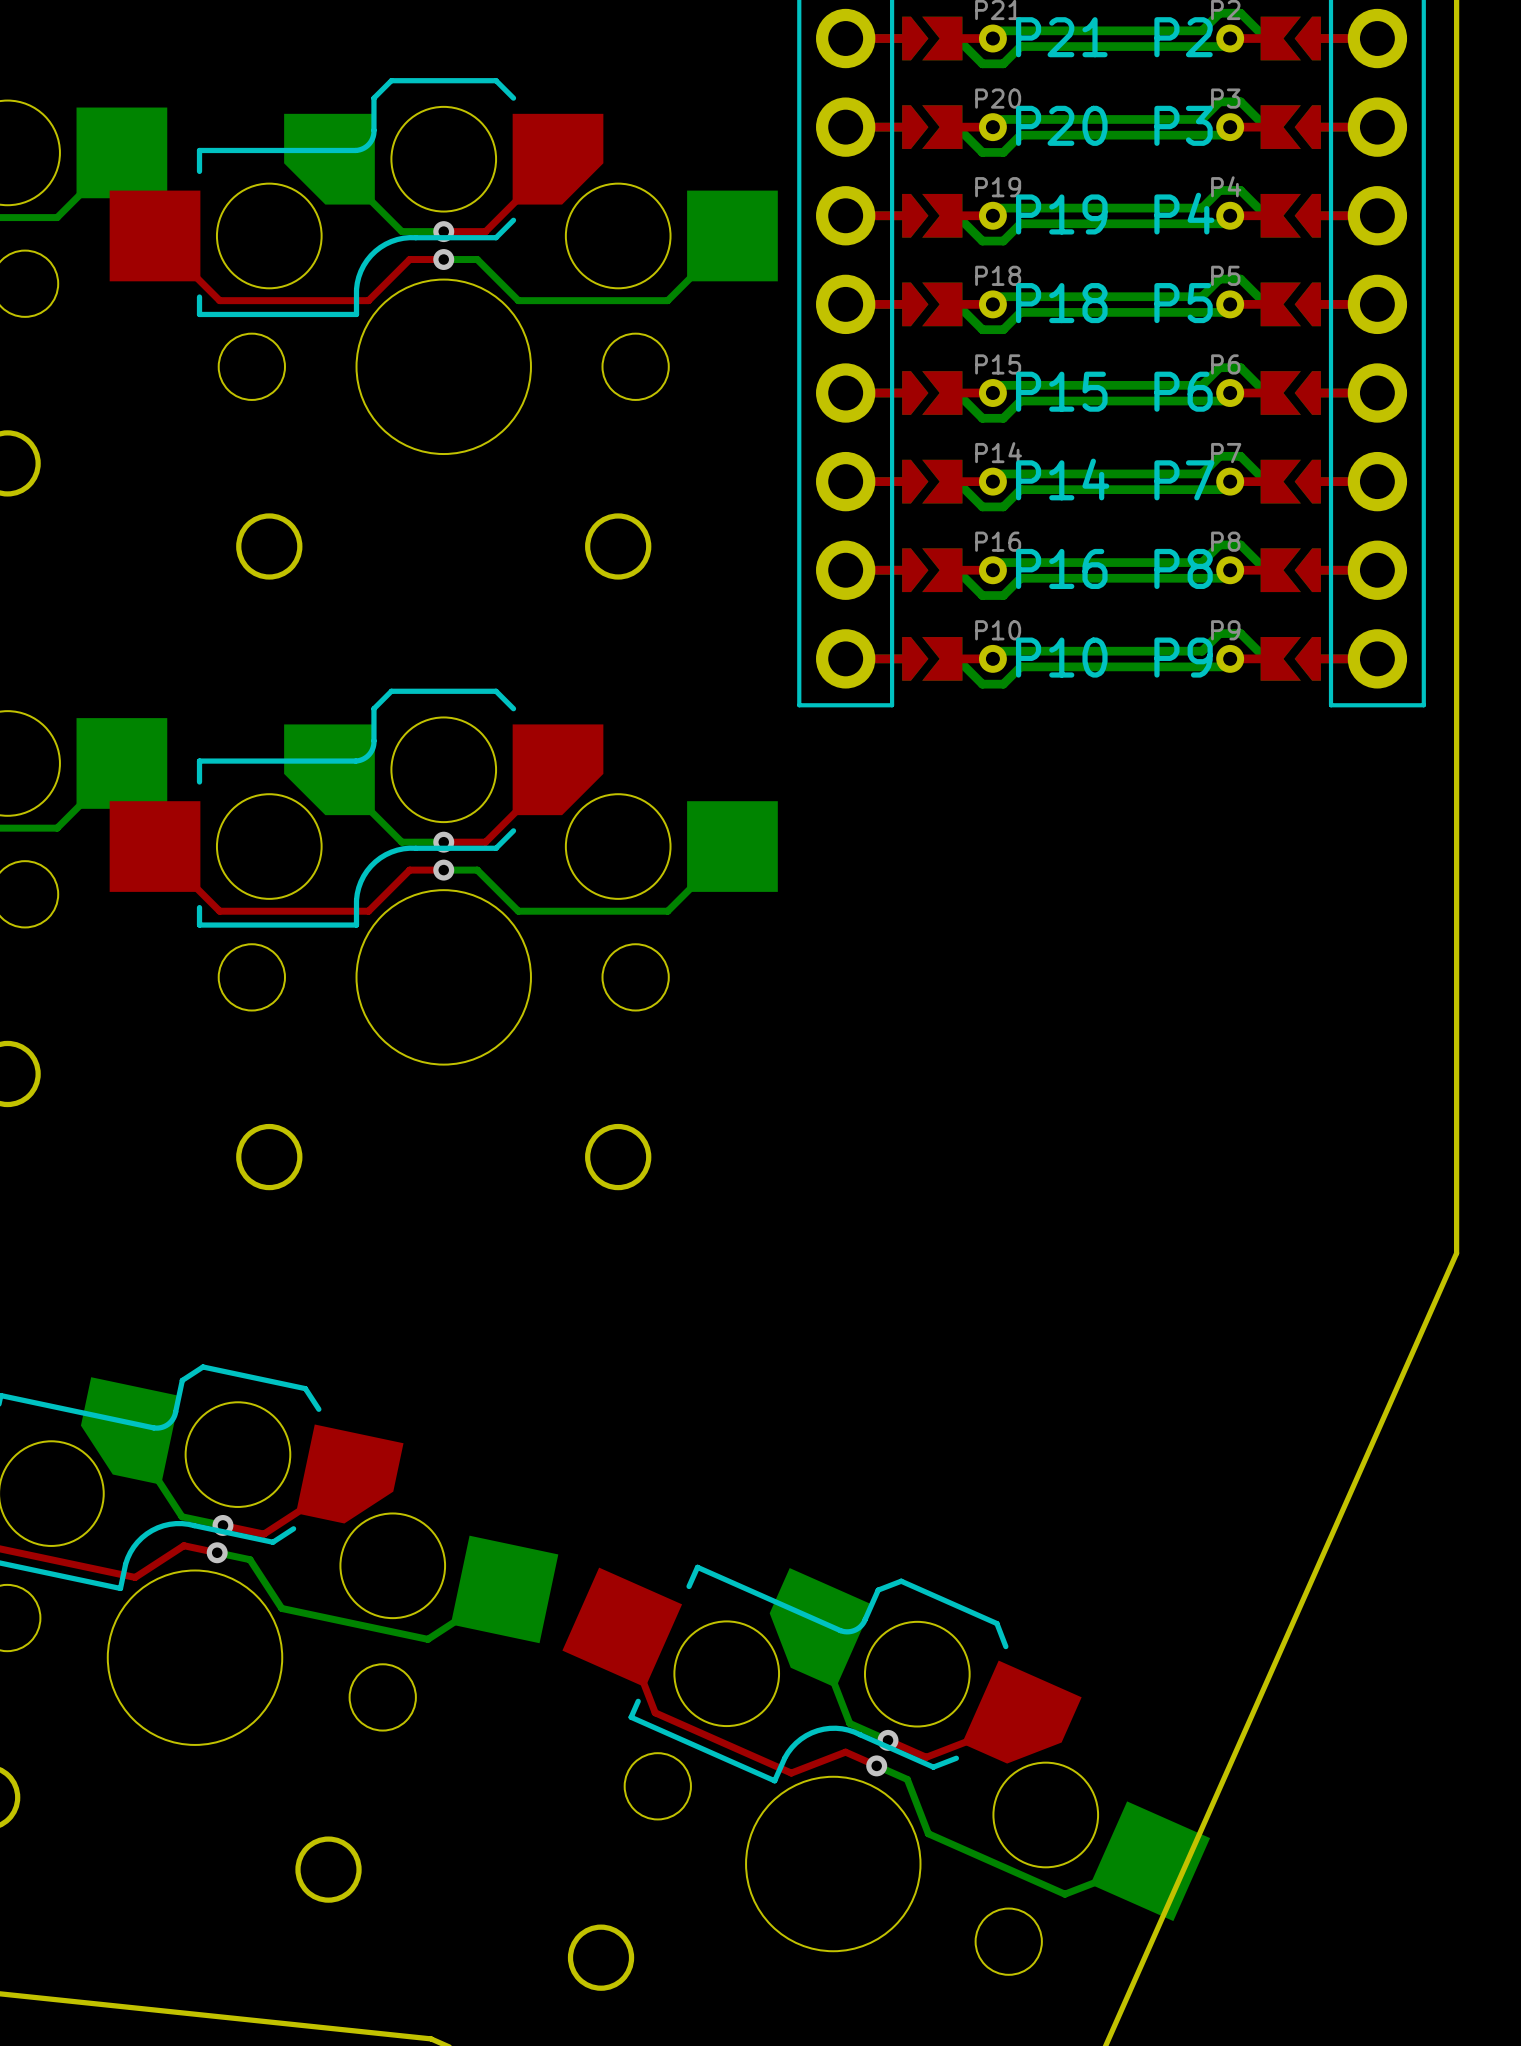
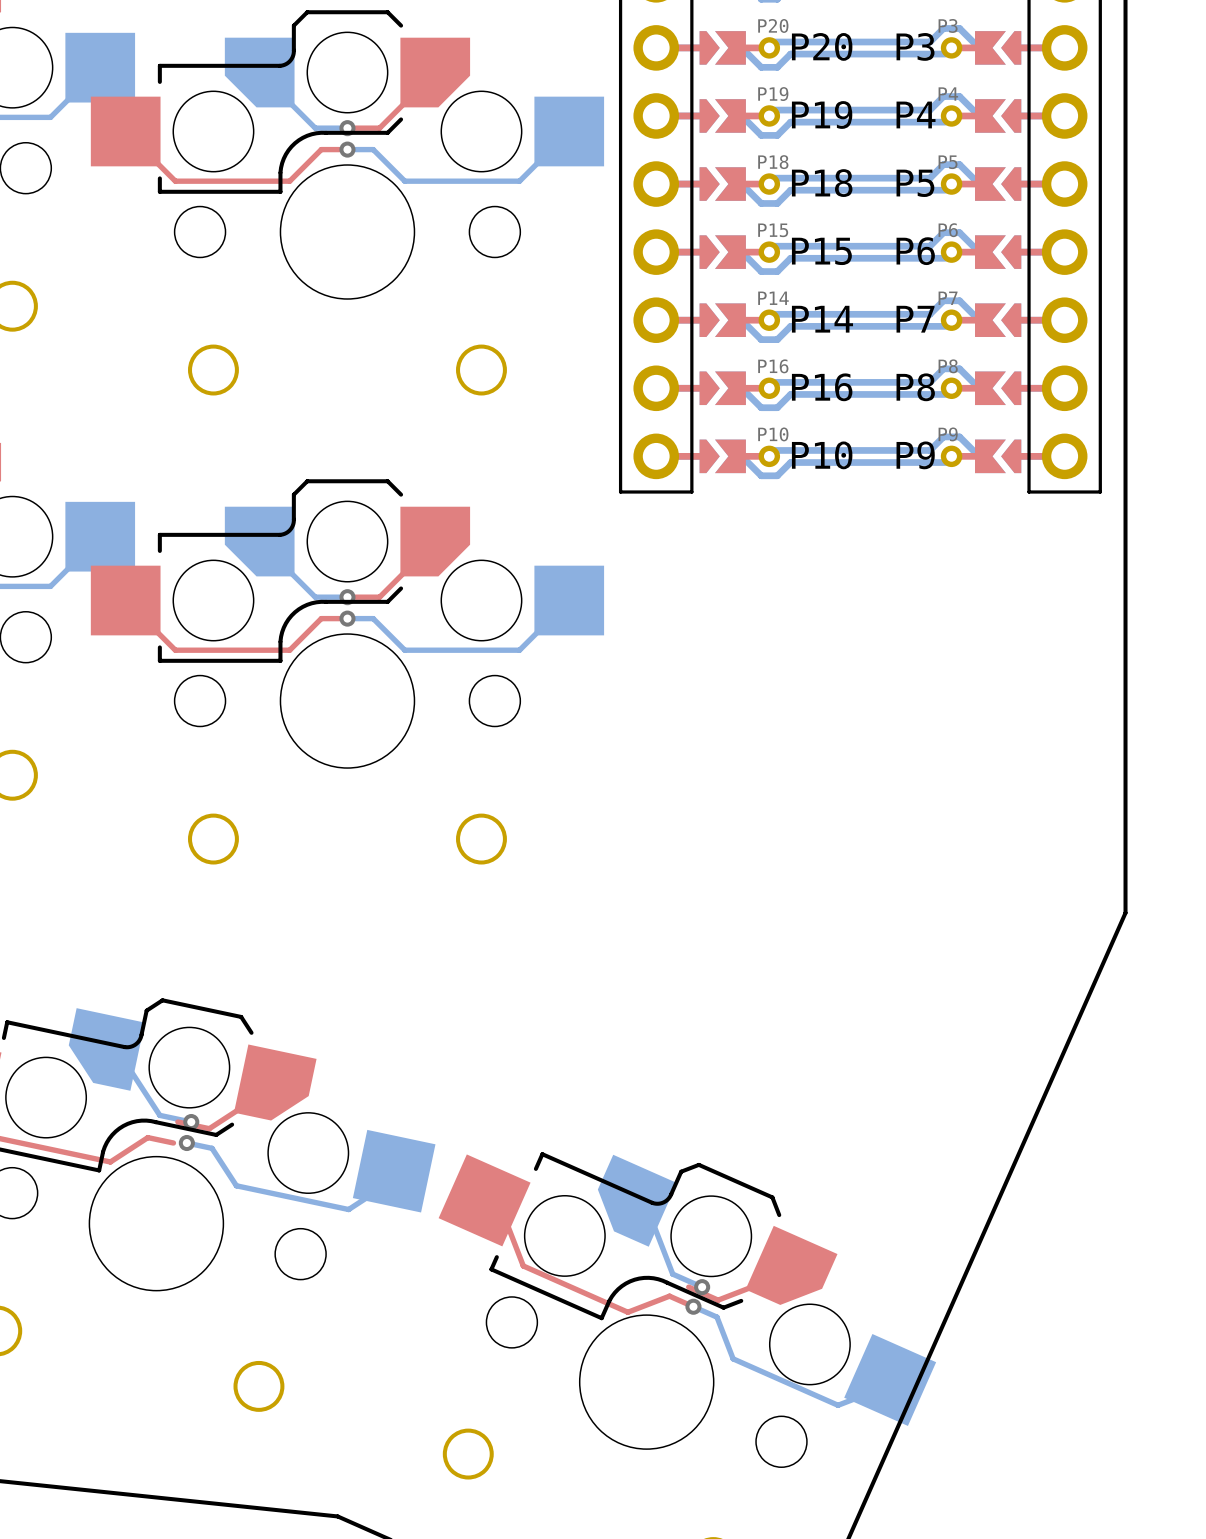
bottom track: (126, 1430) (182, 1516) (222, 1525) -> (116, 1049) (159, 1115) (191, 1122)
via position: (222, 1525) -> (191, 1122)
bottom track: (217, 1552) (250, 1559) (281, 1608) (427, 1639) (504, 1589) -> (186, 1143) (212, 1148) (236, 1185) (348, 1209) (407, 1171)
via position: (217, 1552) -> (186, 1143)
top track: (622, 1627) (655, 1712) (791, 1773) (845, 1752) (876, 1765) -> (497, 1200) (523, 1265) (627, 1312) (669, 1296) (693, 1306)
bottom track: (812, 1627) (849, 1723) (888, 1740) -> (644, 1200) (672, 1274) (702, 1287)
via position: (888, 1740) -> (702, 1287)
bottom track: (876, 1765) (907, 1779) (928, 1833) (1064, 1894) (1150, 1861) -> (693, 1306) (717, 1317) (733, 1358) (838, 1405) (903, 1379)
via position: (876, 1765) -> (693, 1306)

